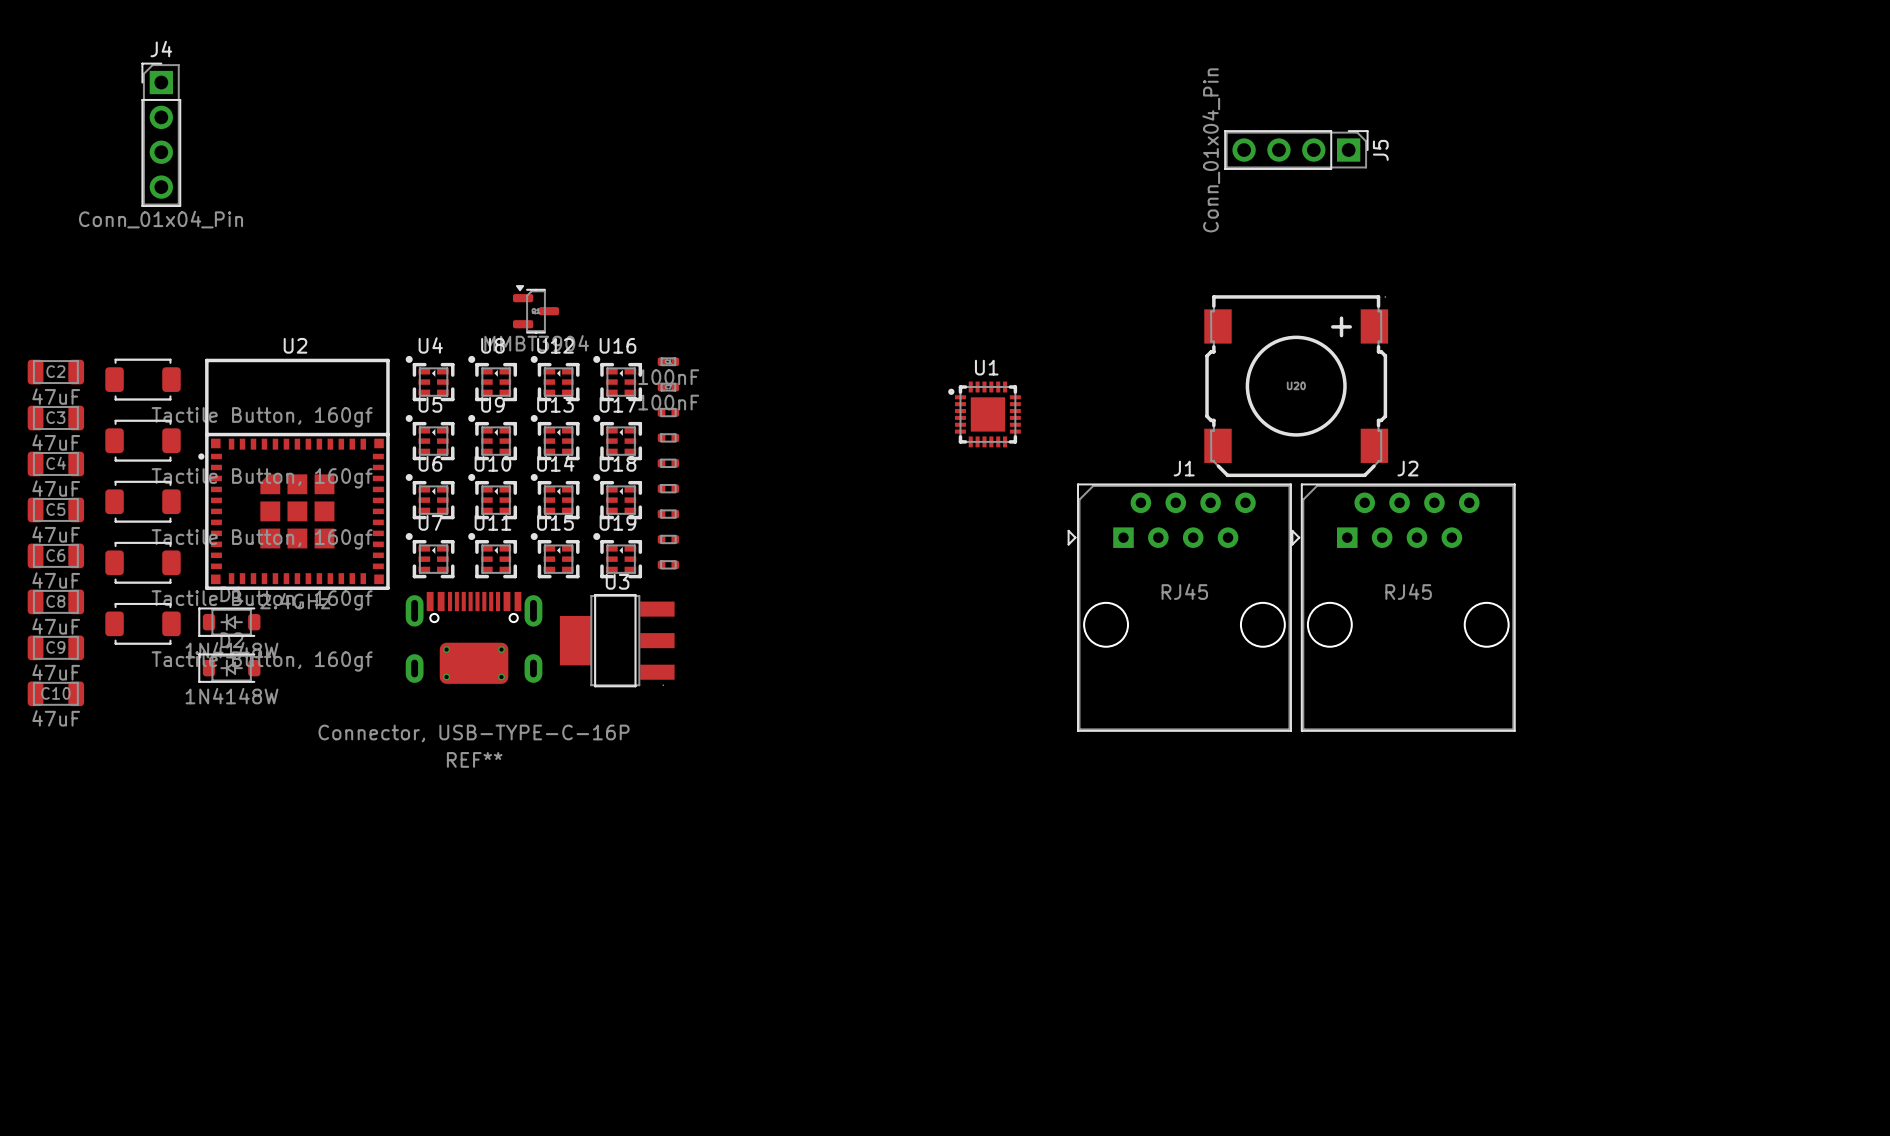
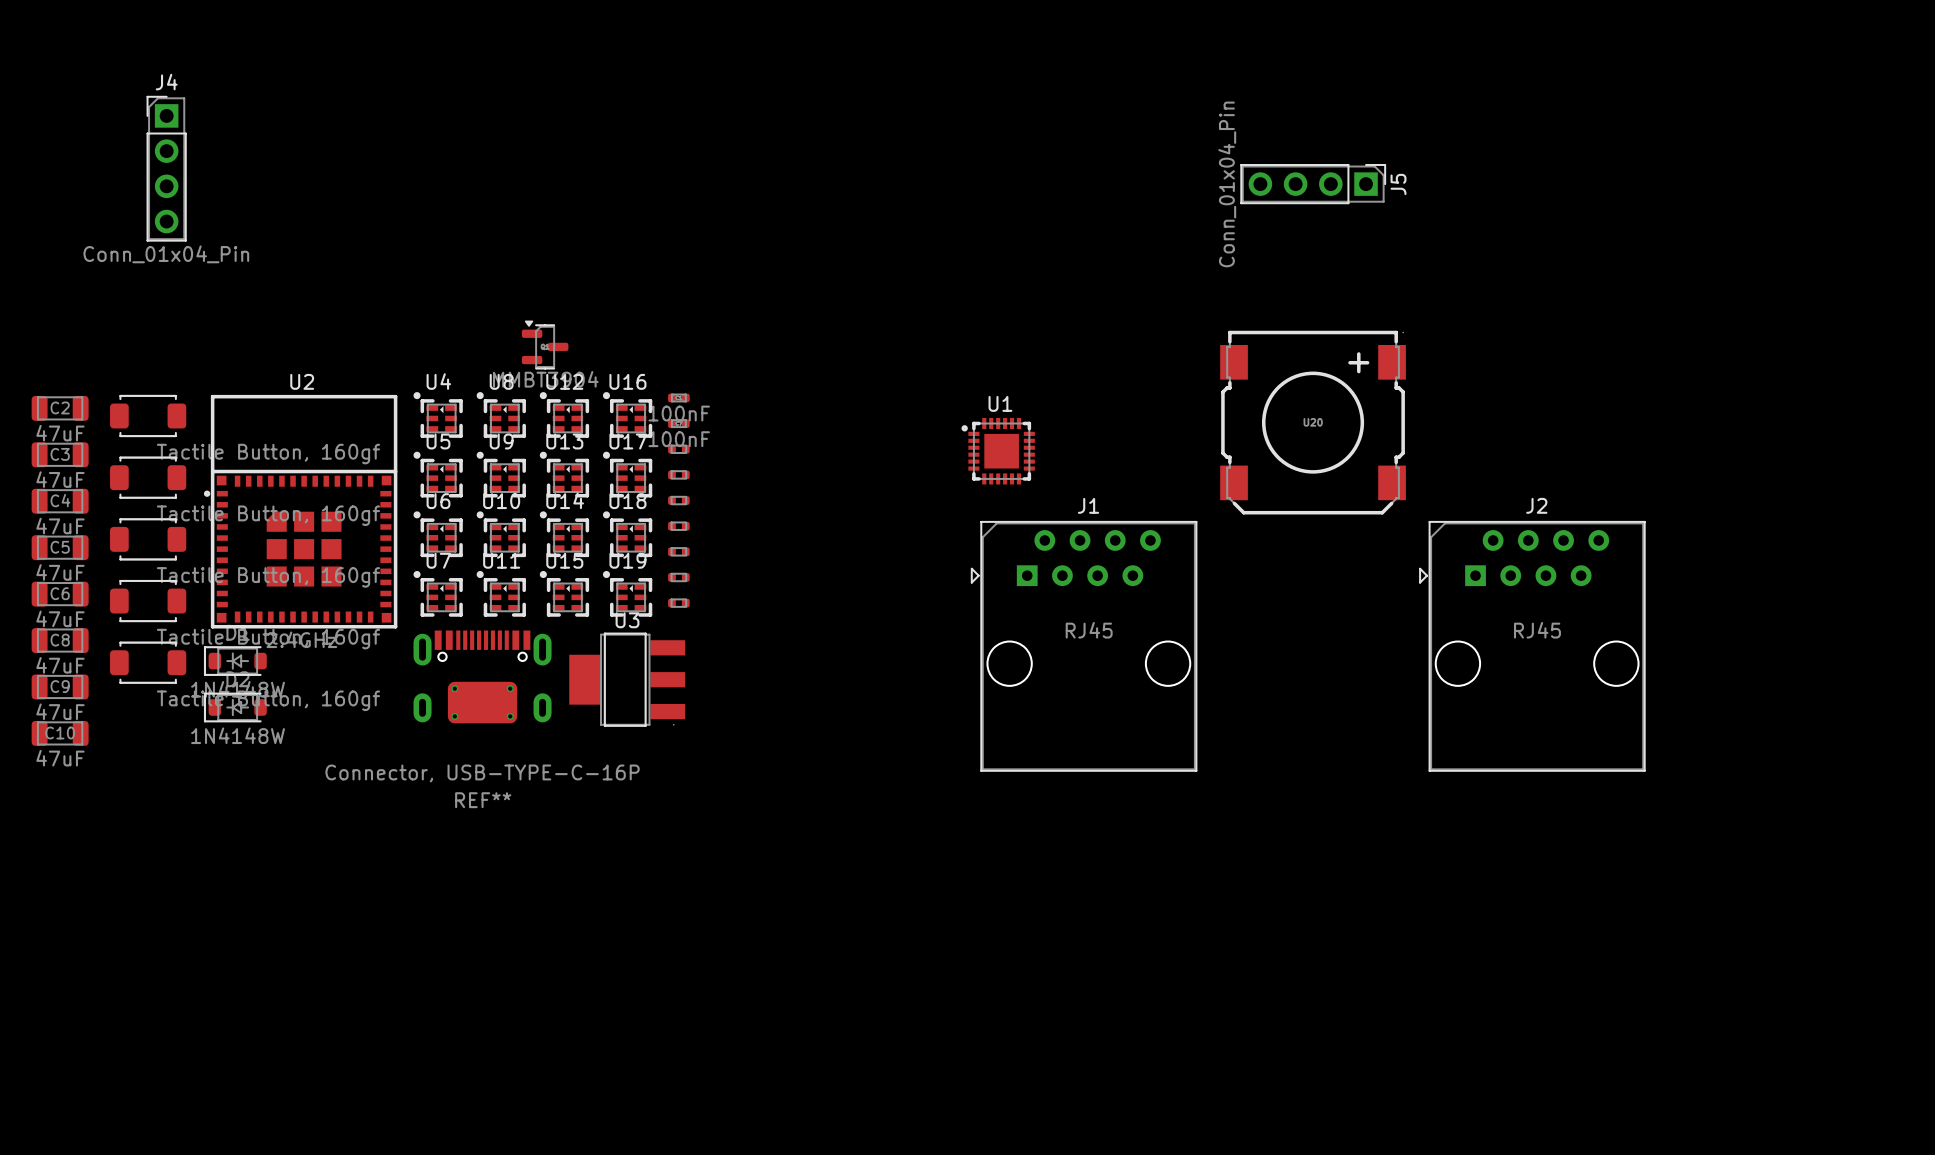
J1 position: (1179, 607) -> (1084, 646)
J2 position: (1403, 607) -> (1532, 646)

